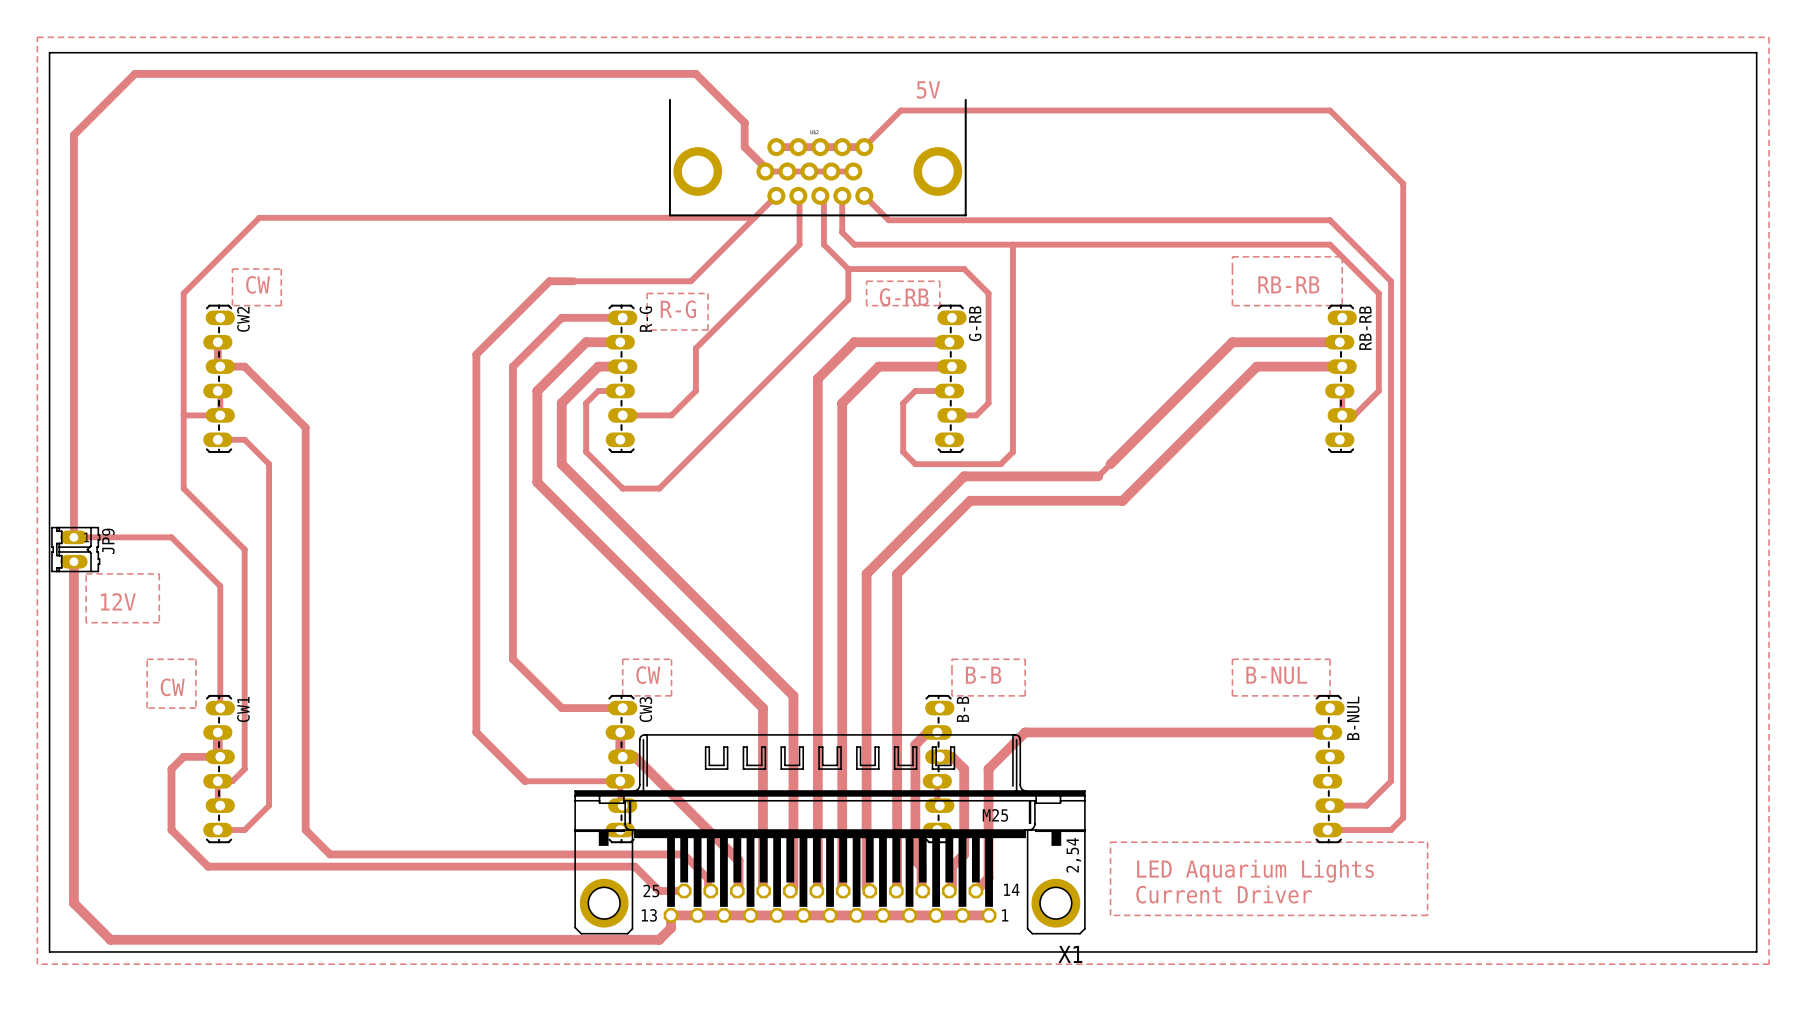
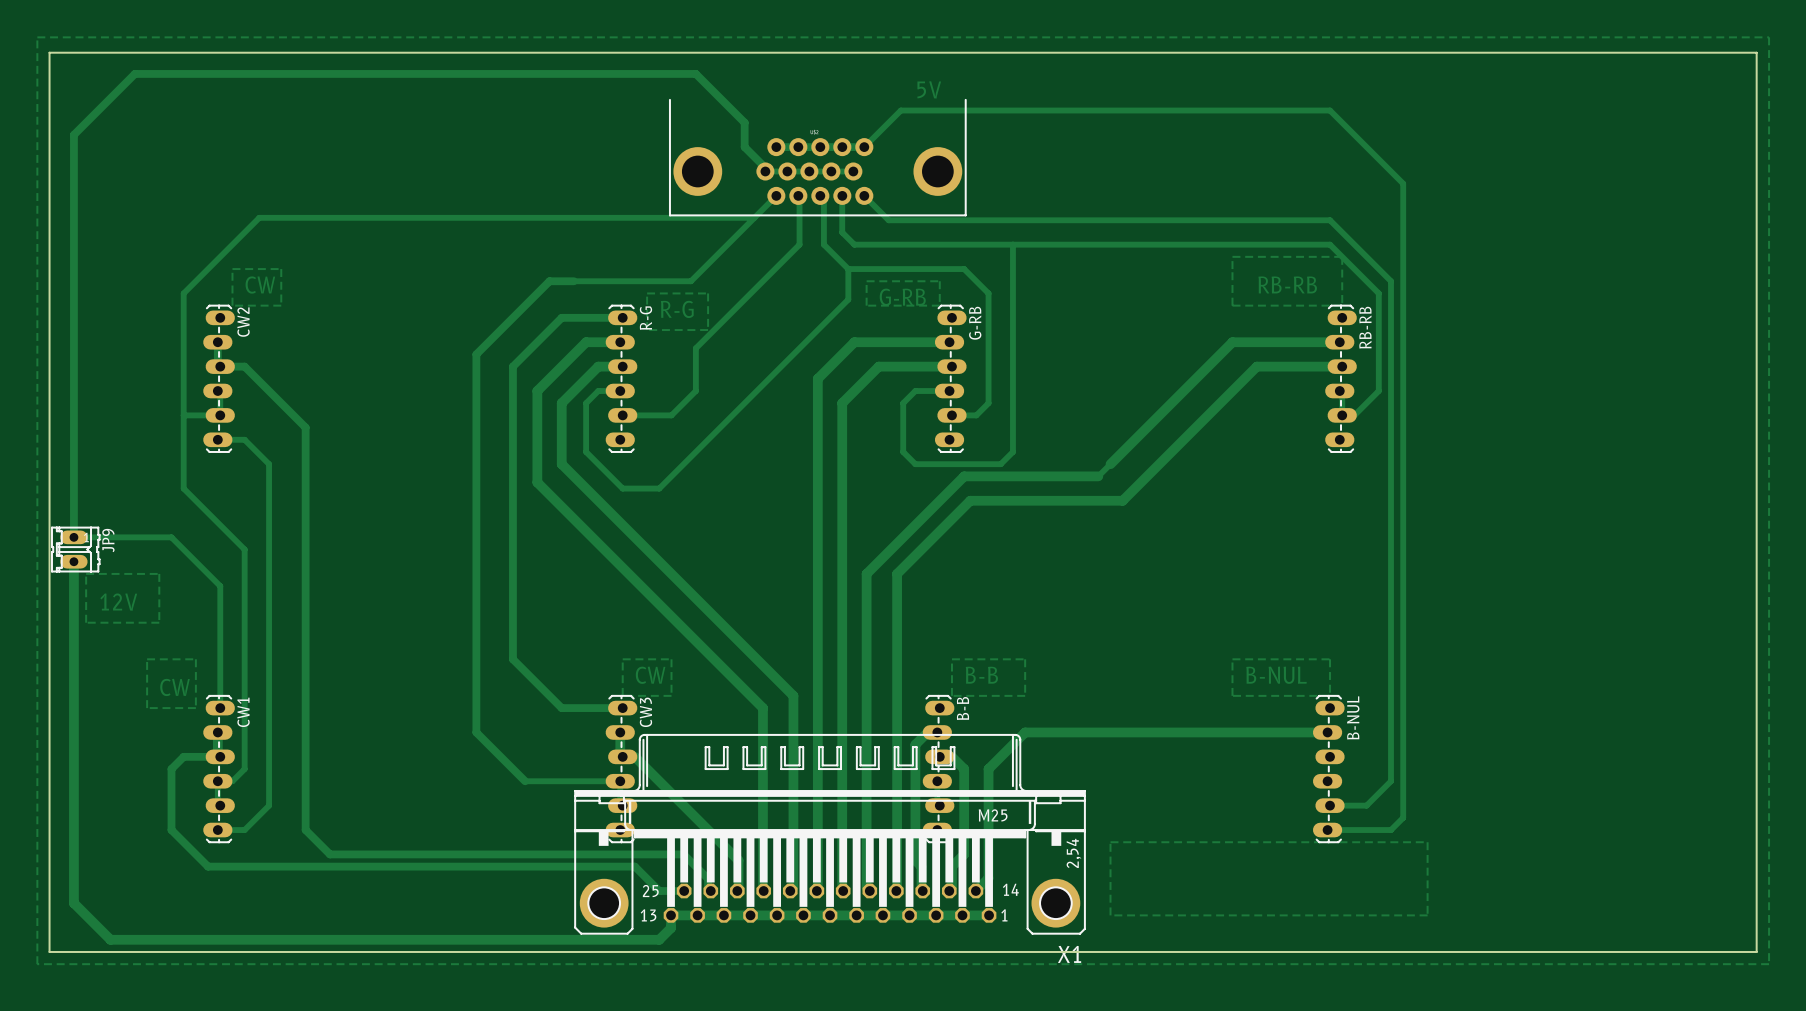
text: LED Aquarium Lights (1255, 871) -> none
text: Current Driver (1224, 894) -> none

